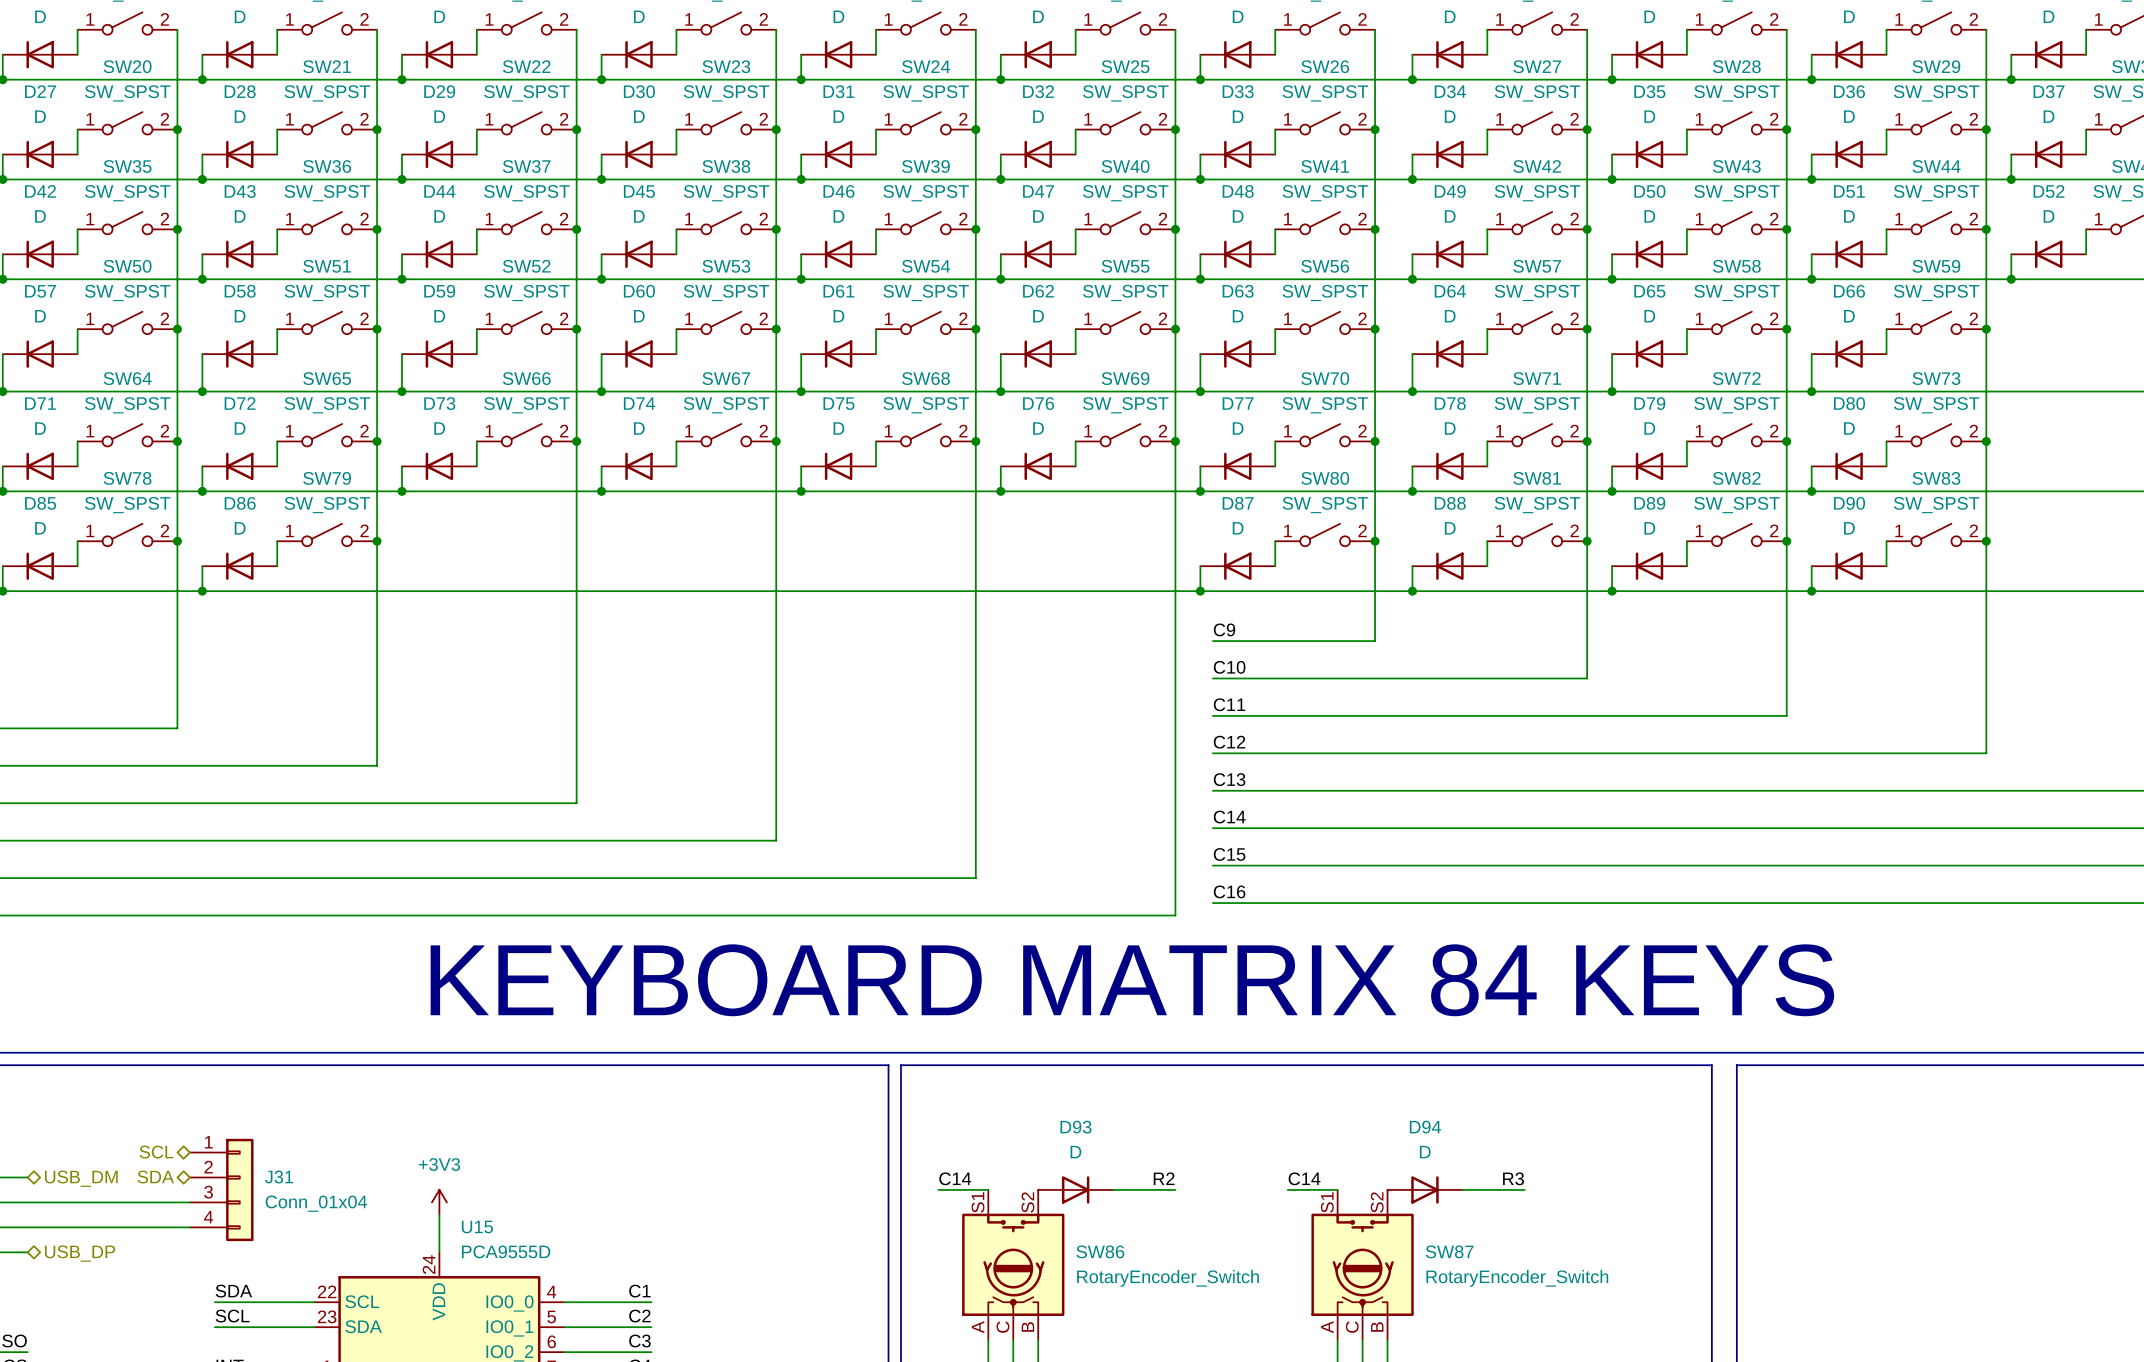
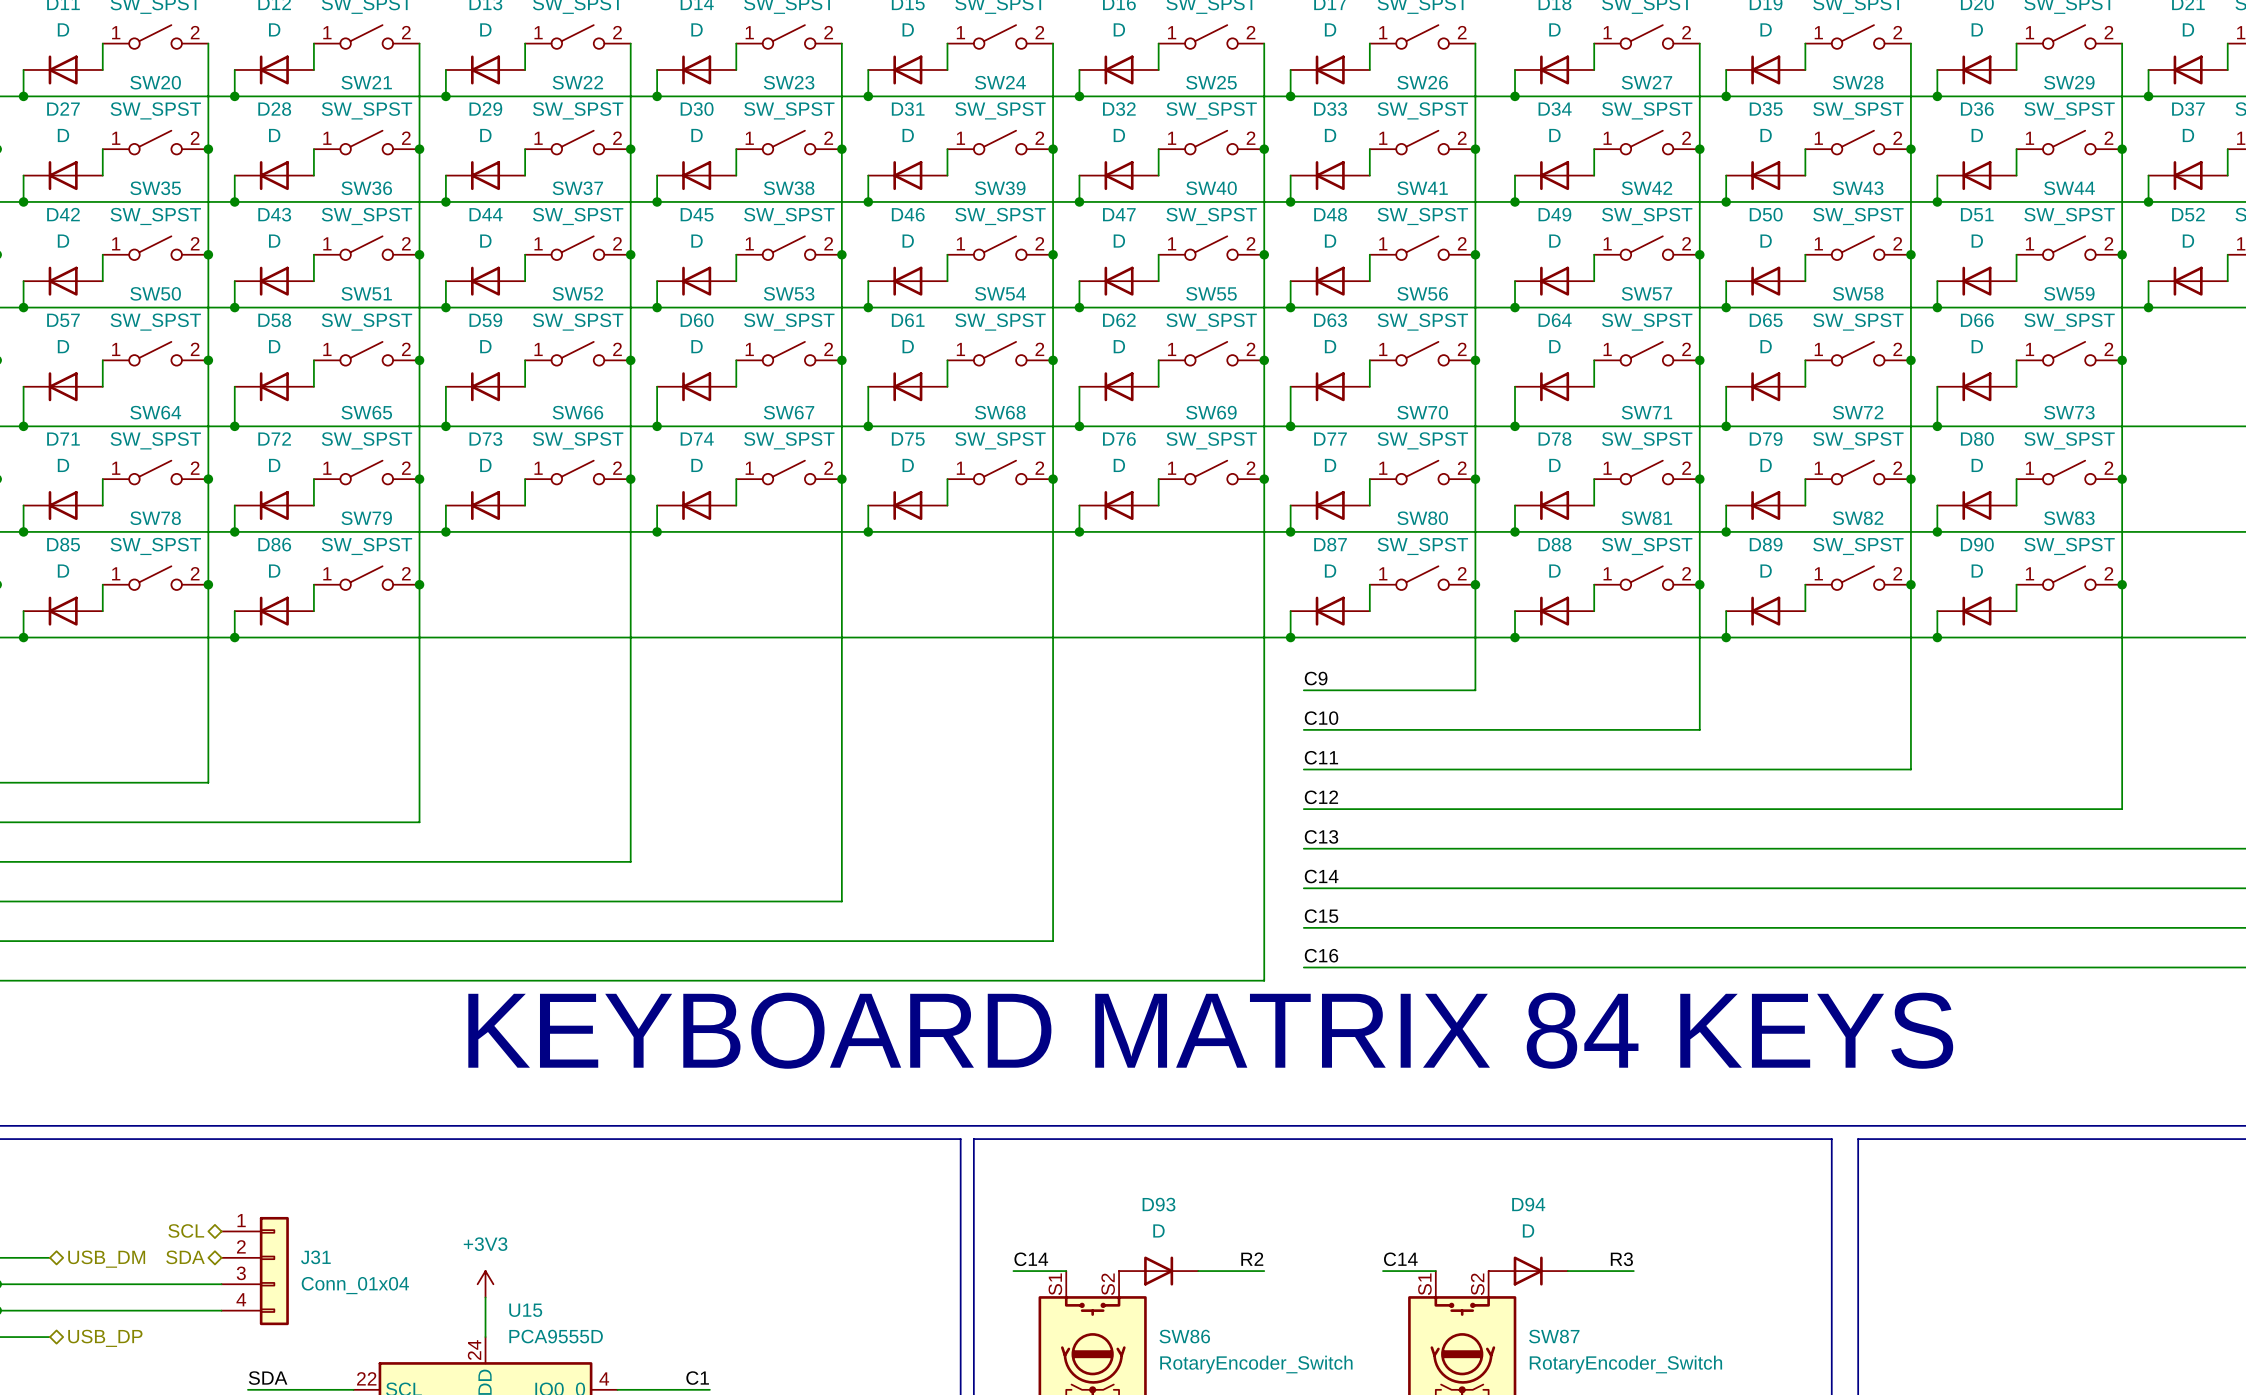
text position: KEYBOARD MATRIX 84 KEYS (1132, 980) -> KEYBOARD MATRIX 84 KEYS (1210, 1030)

